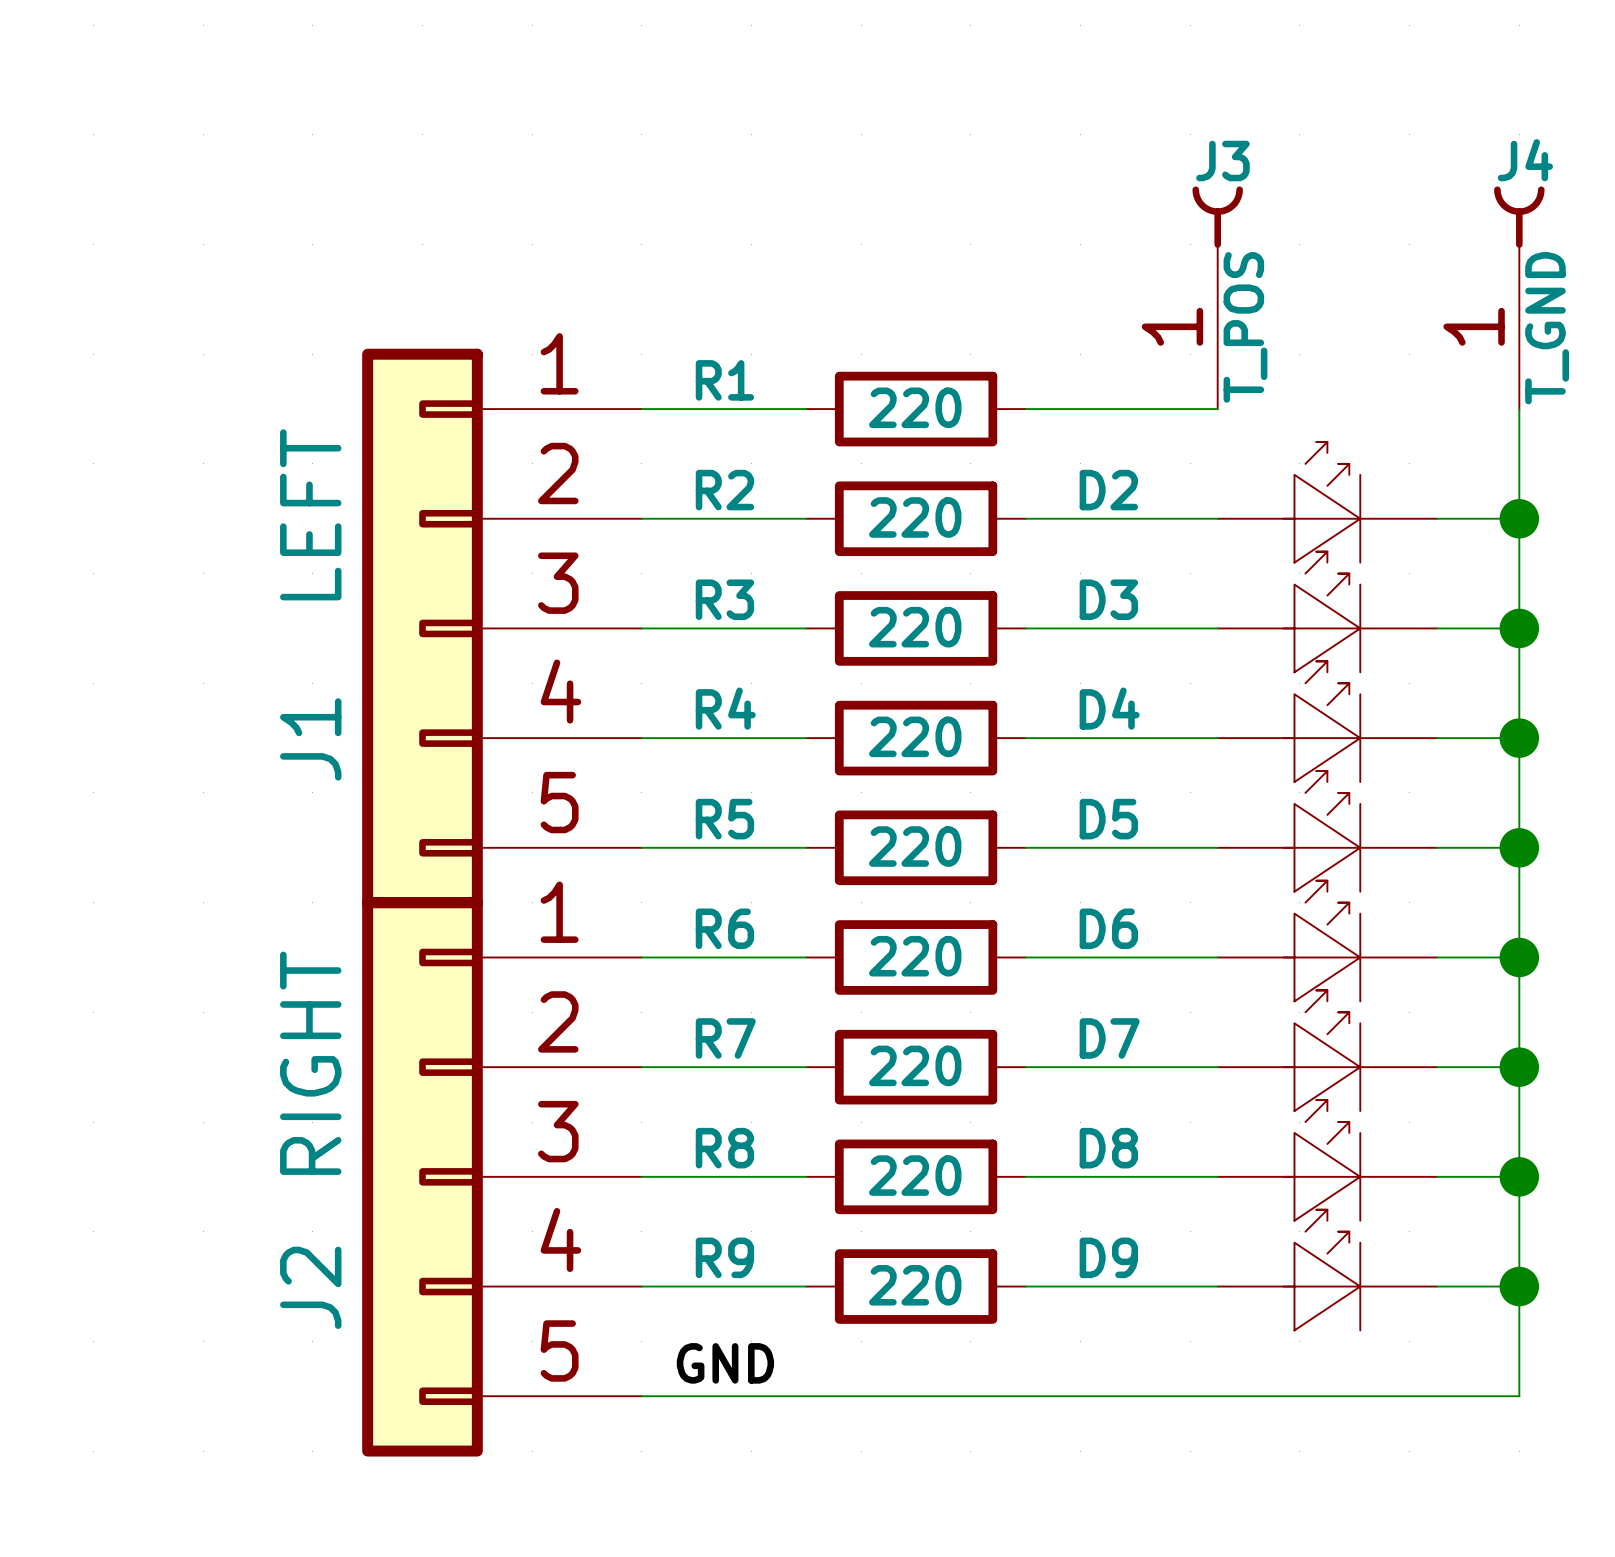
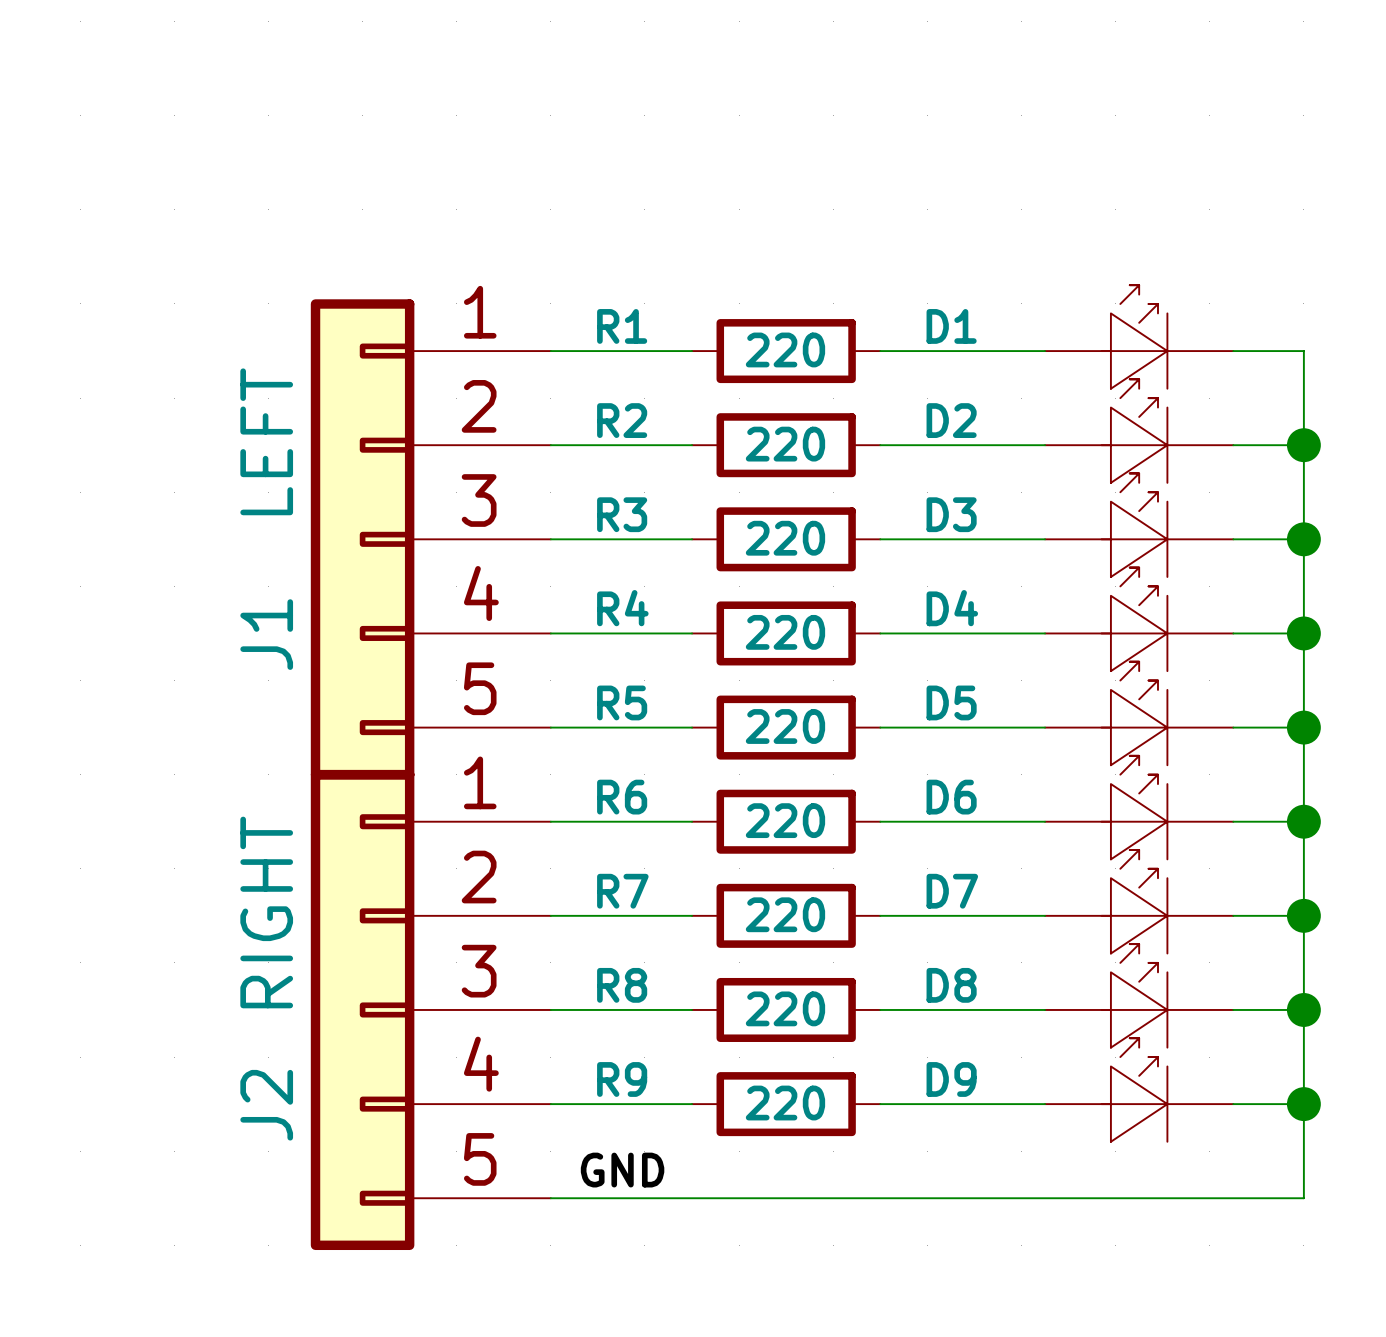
J3: T_POS (1217, 297) -> none
J4: T_GND (1519, 297) -> none
D1: none -> (1139, 336)
wire: none -> (1233, 351) (1303, 351)

